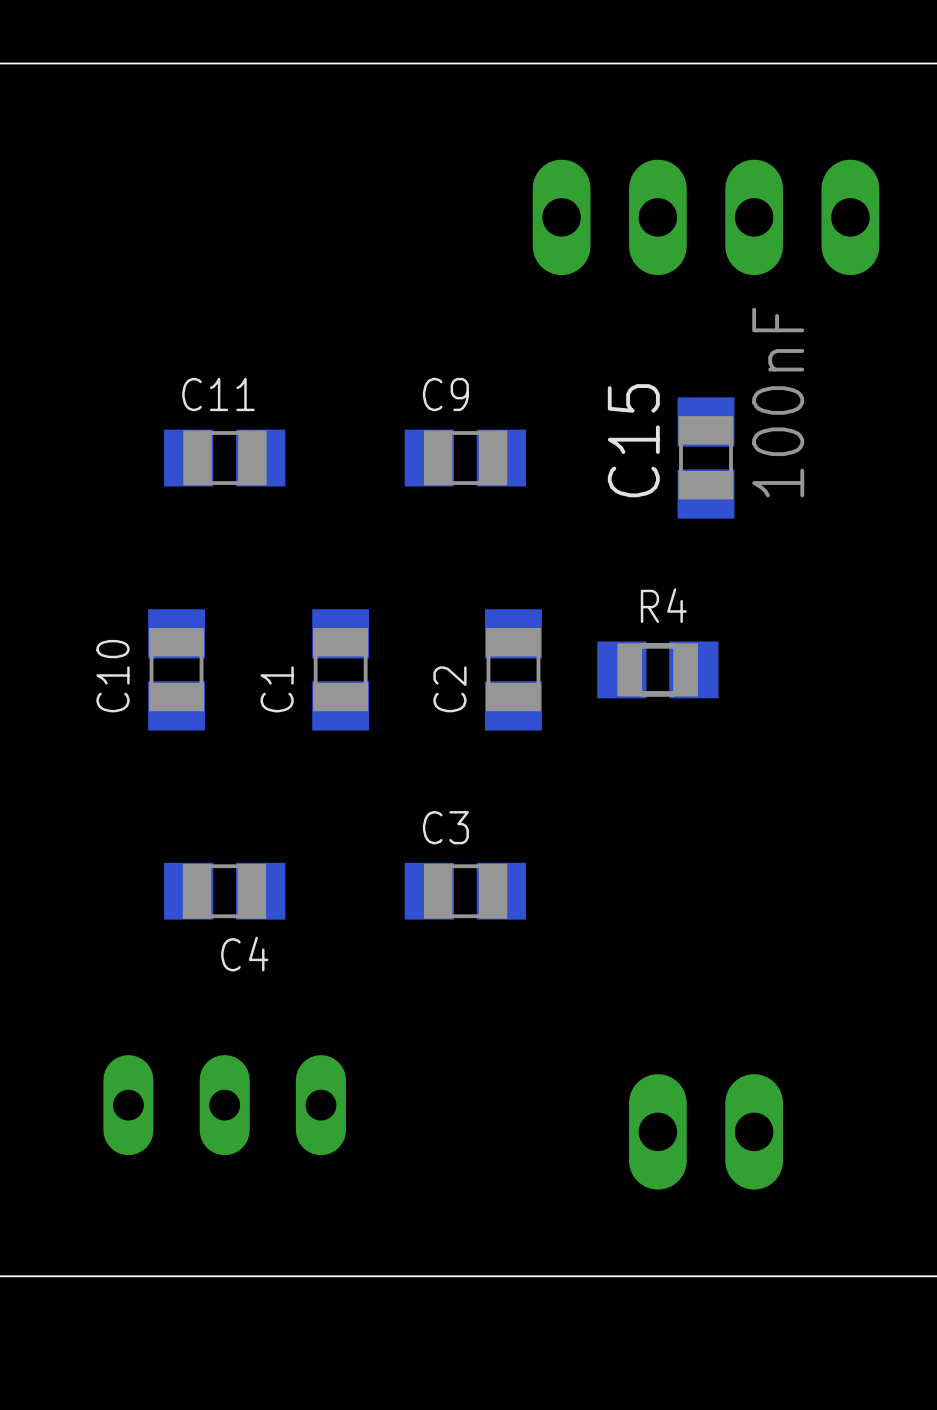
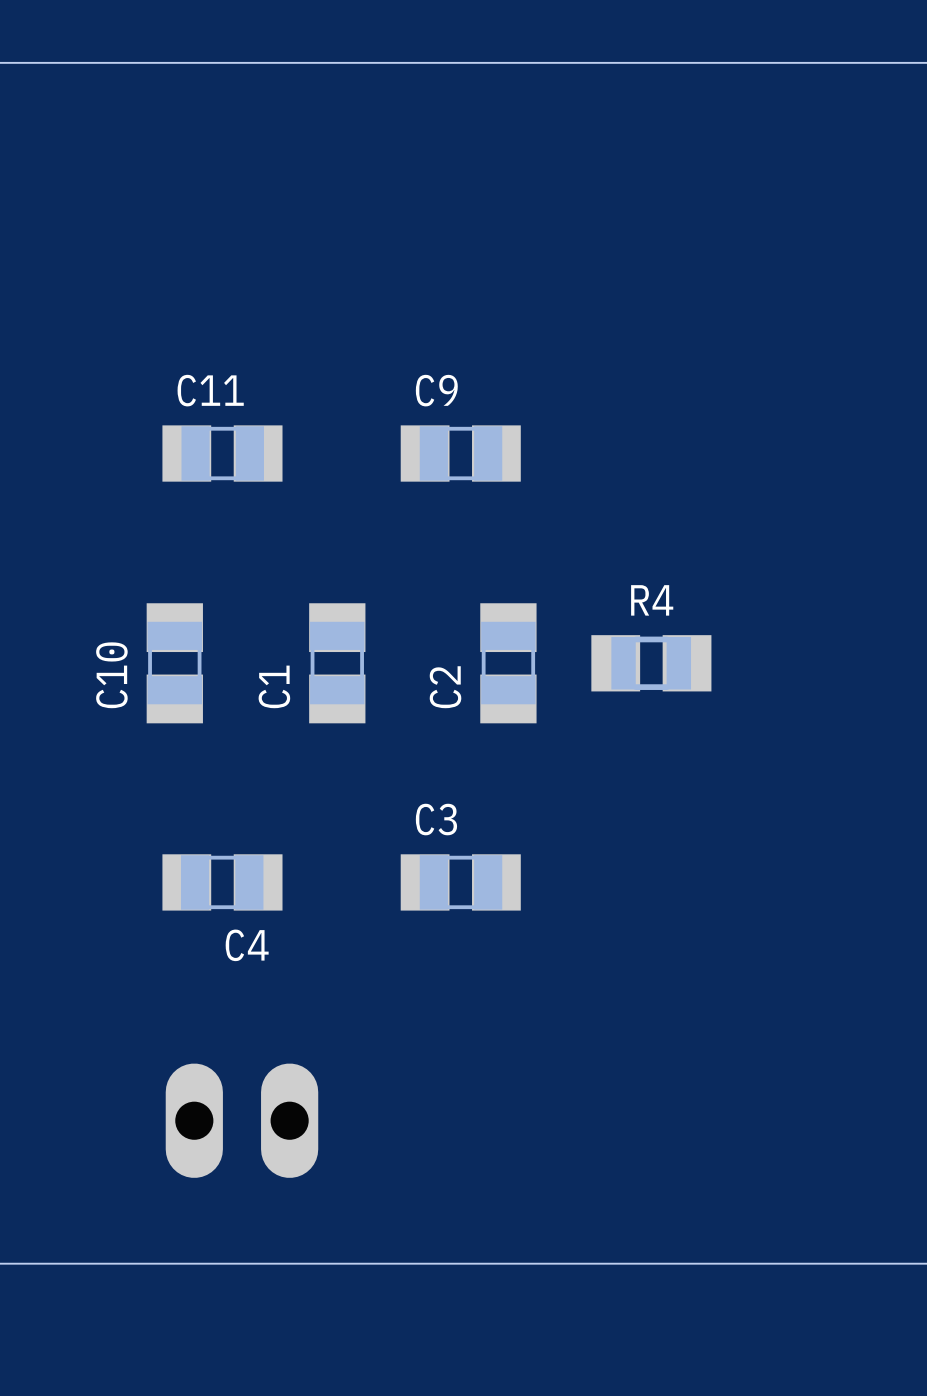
part: (706, 217) -> none
C15: 100nF (706, 458) -> none
part footprint: [103, 1055, 346, 1156] -> [165, 1063, 319, 1178]
part: (706, 1131) -> none

